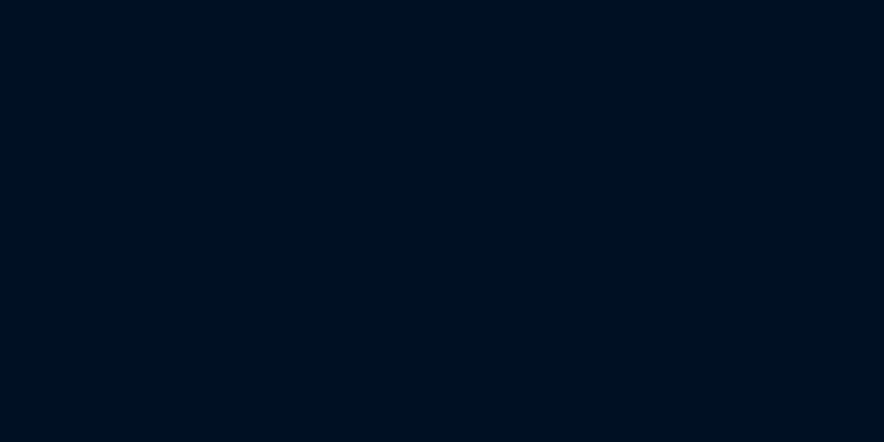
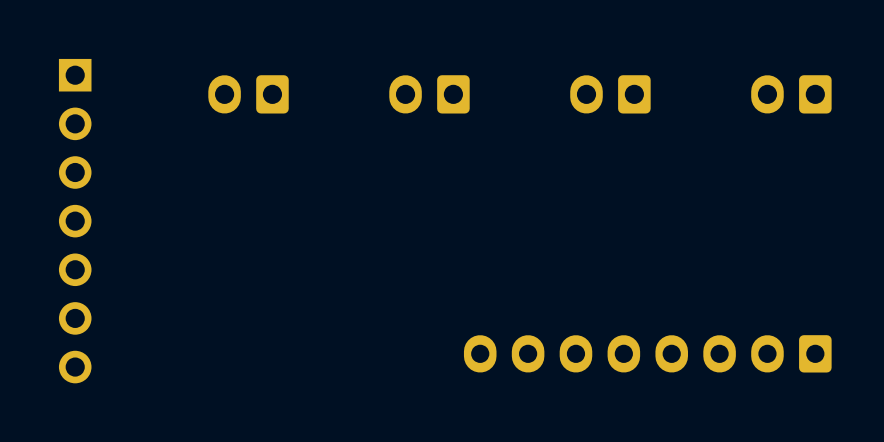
part: none -> (248, 94)
part: none -> (429, 94)
part: none -> (610, 94)
part: none -> (791, 94)
part: none -> (75, 221)
part: none -> (647, 353)

